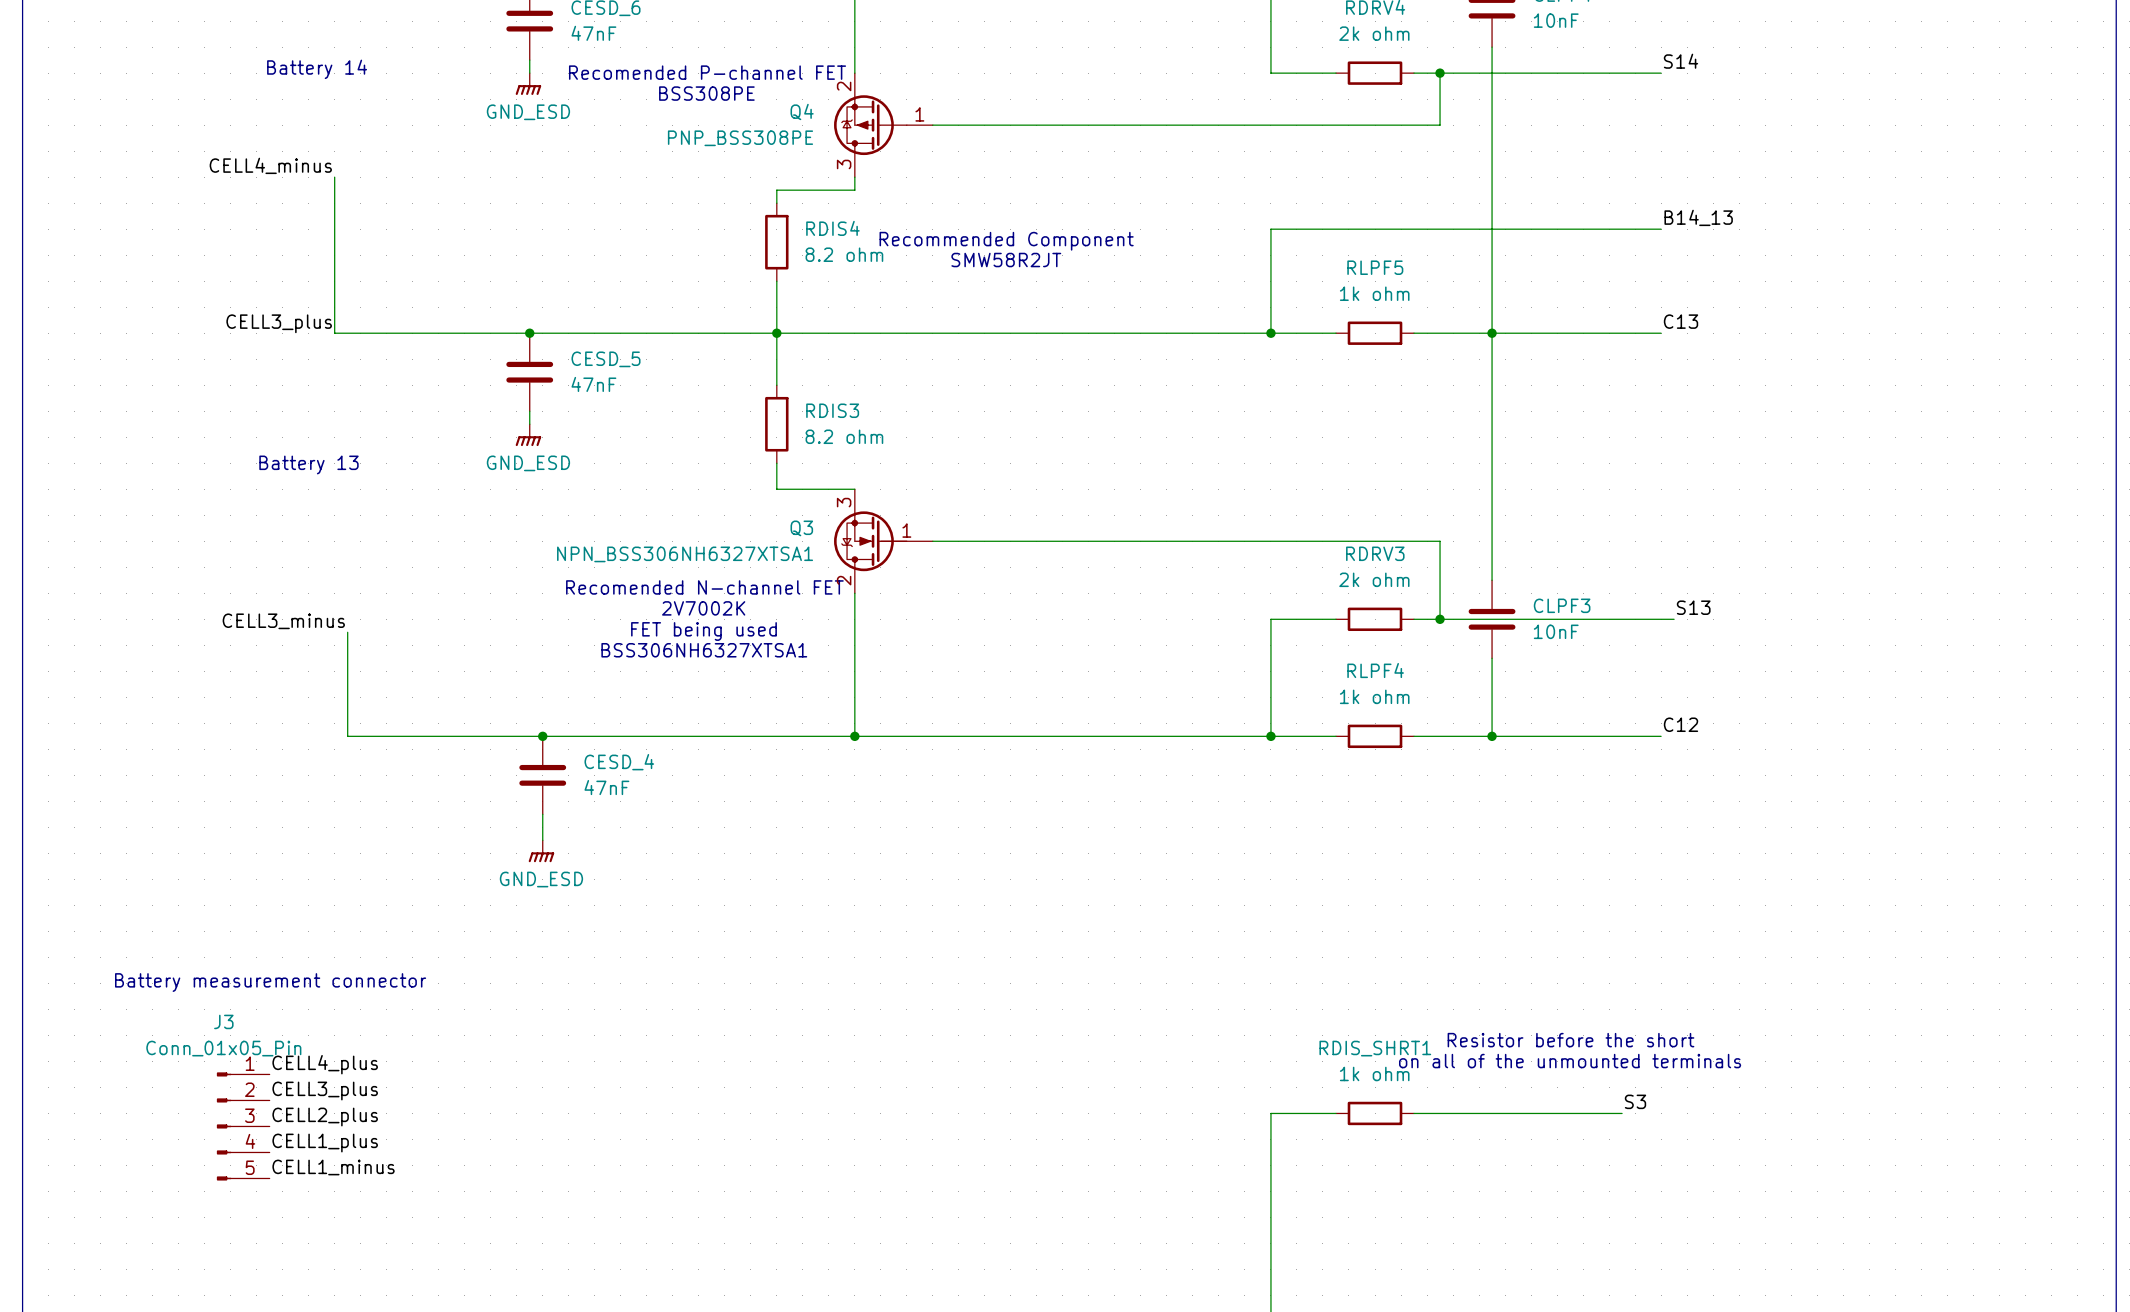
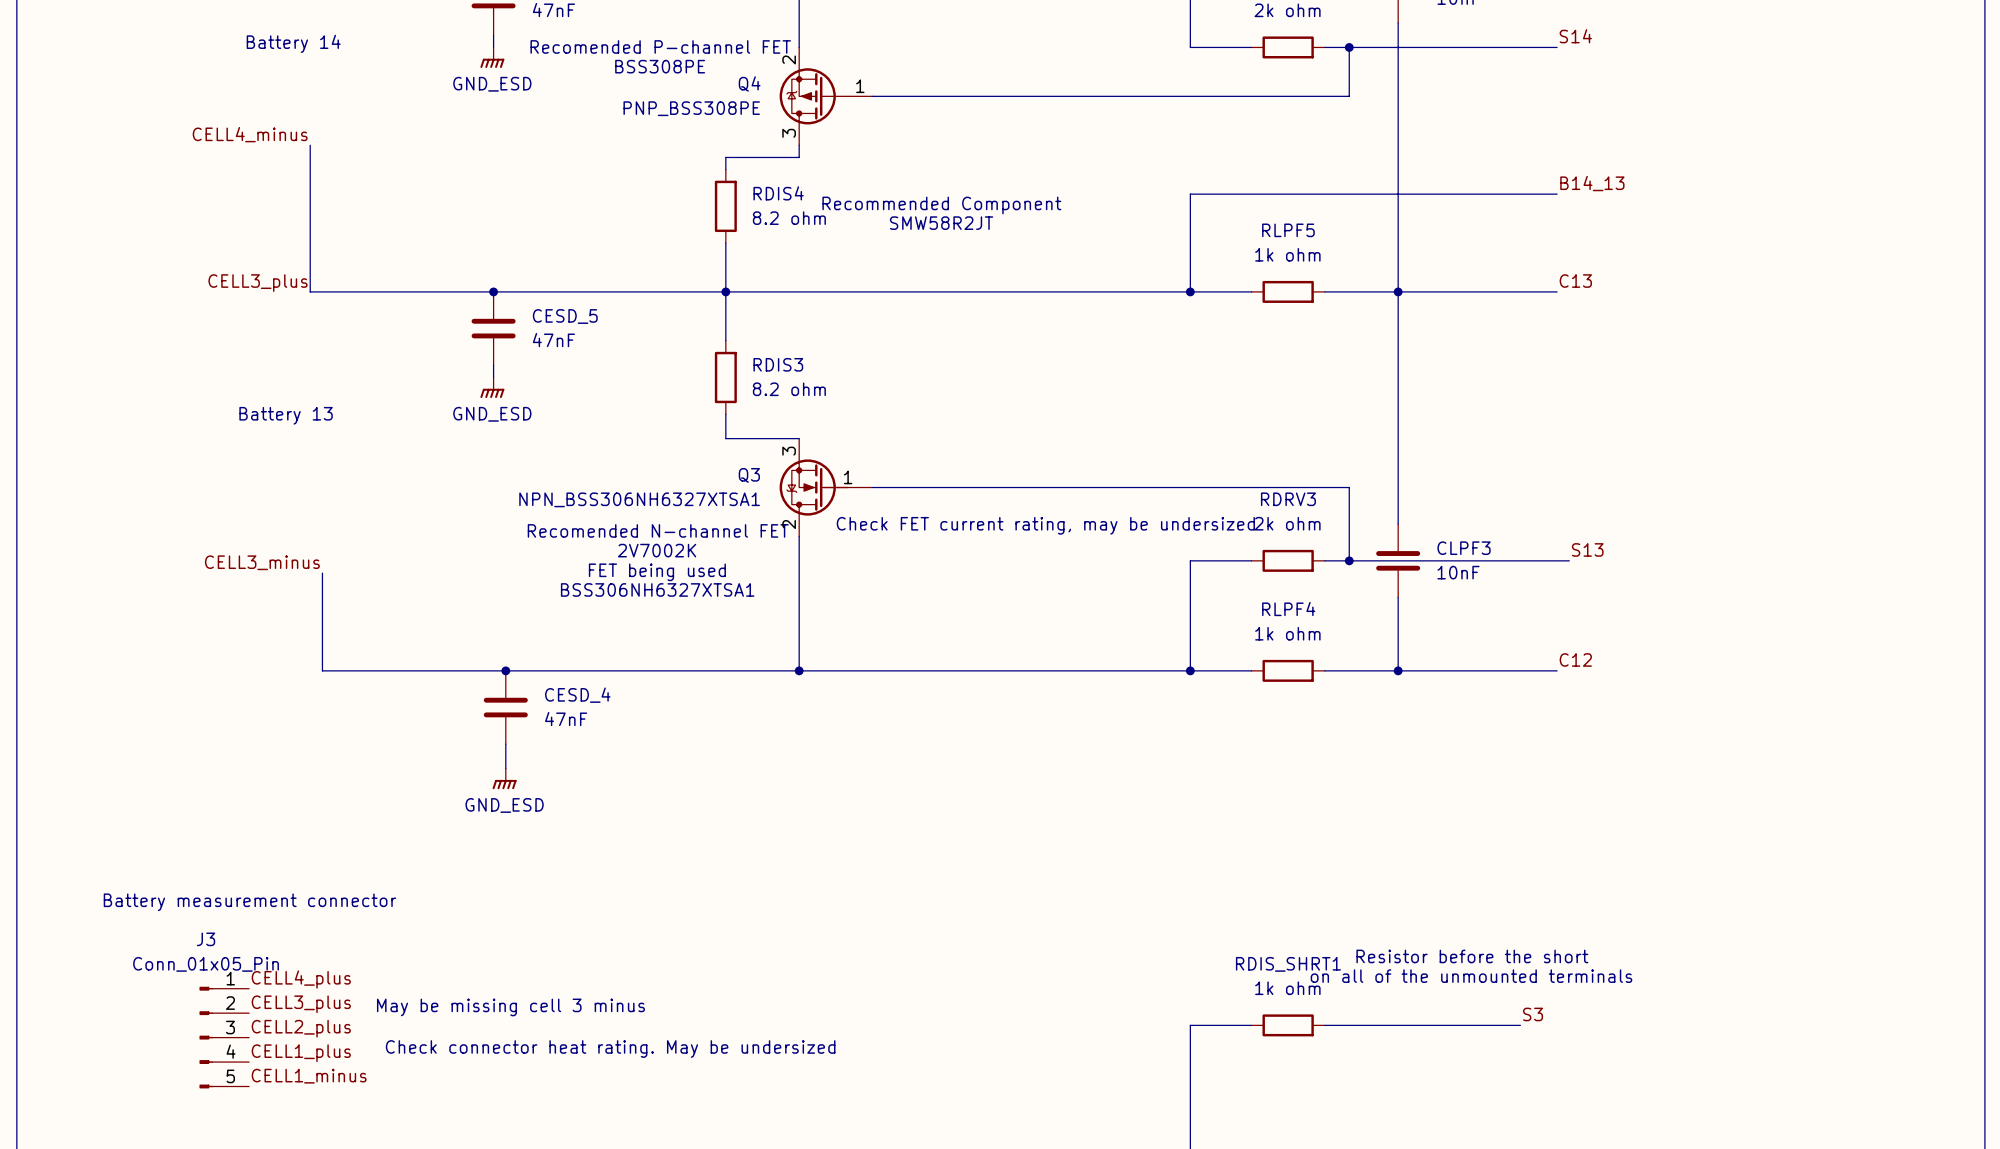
text: none -> Check FET current rating, may be undersized (1045, 525)
text: none -> May be missing cell 3 minus (510, 1007)
text: none -> Check connector heat rating. May be undersized (610, 1049)

